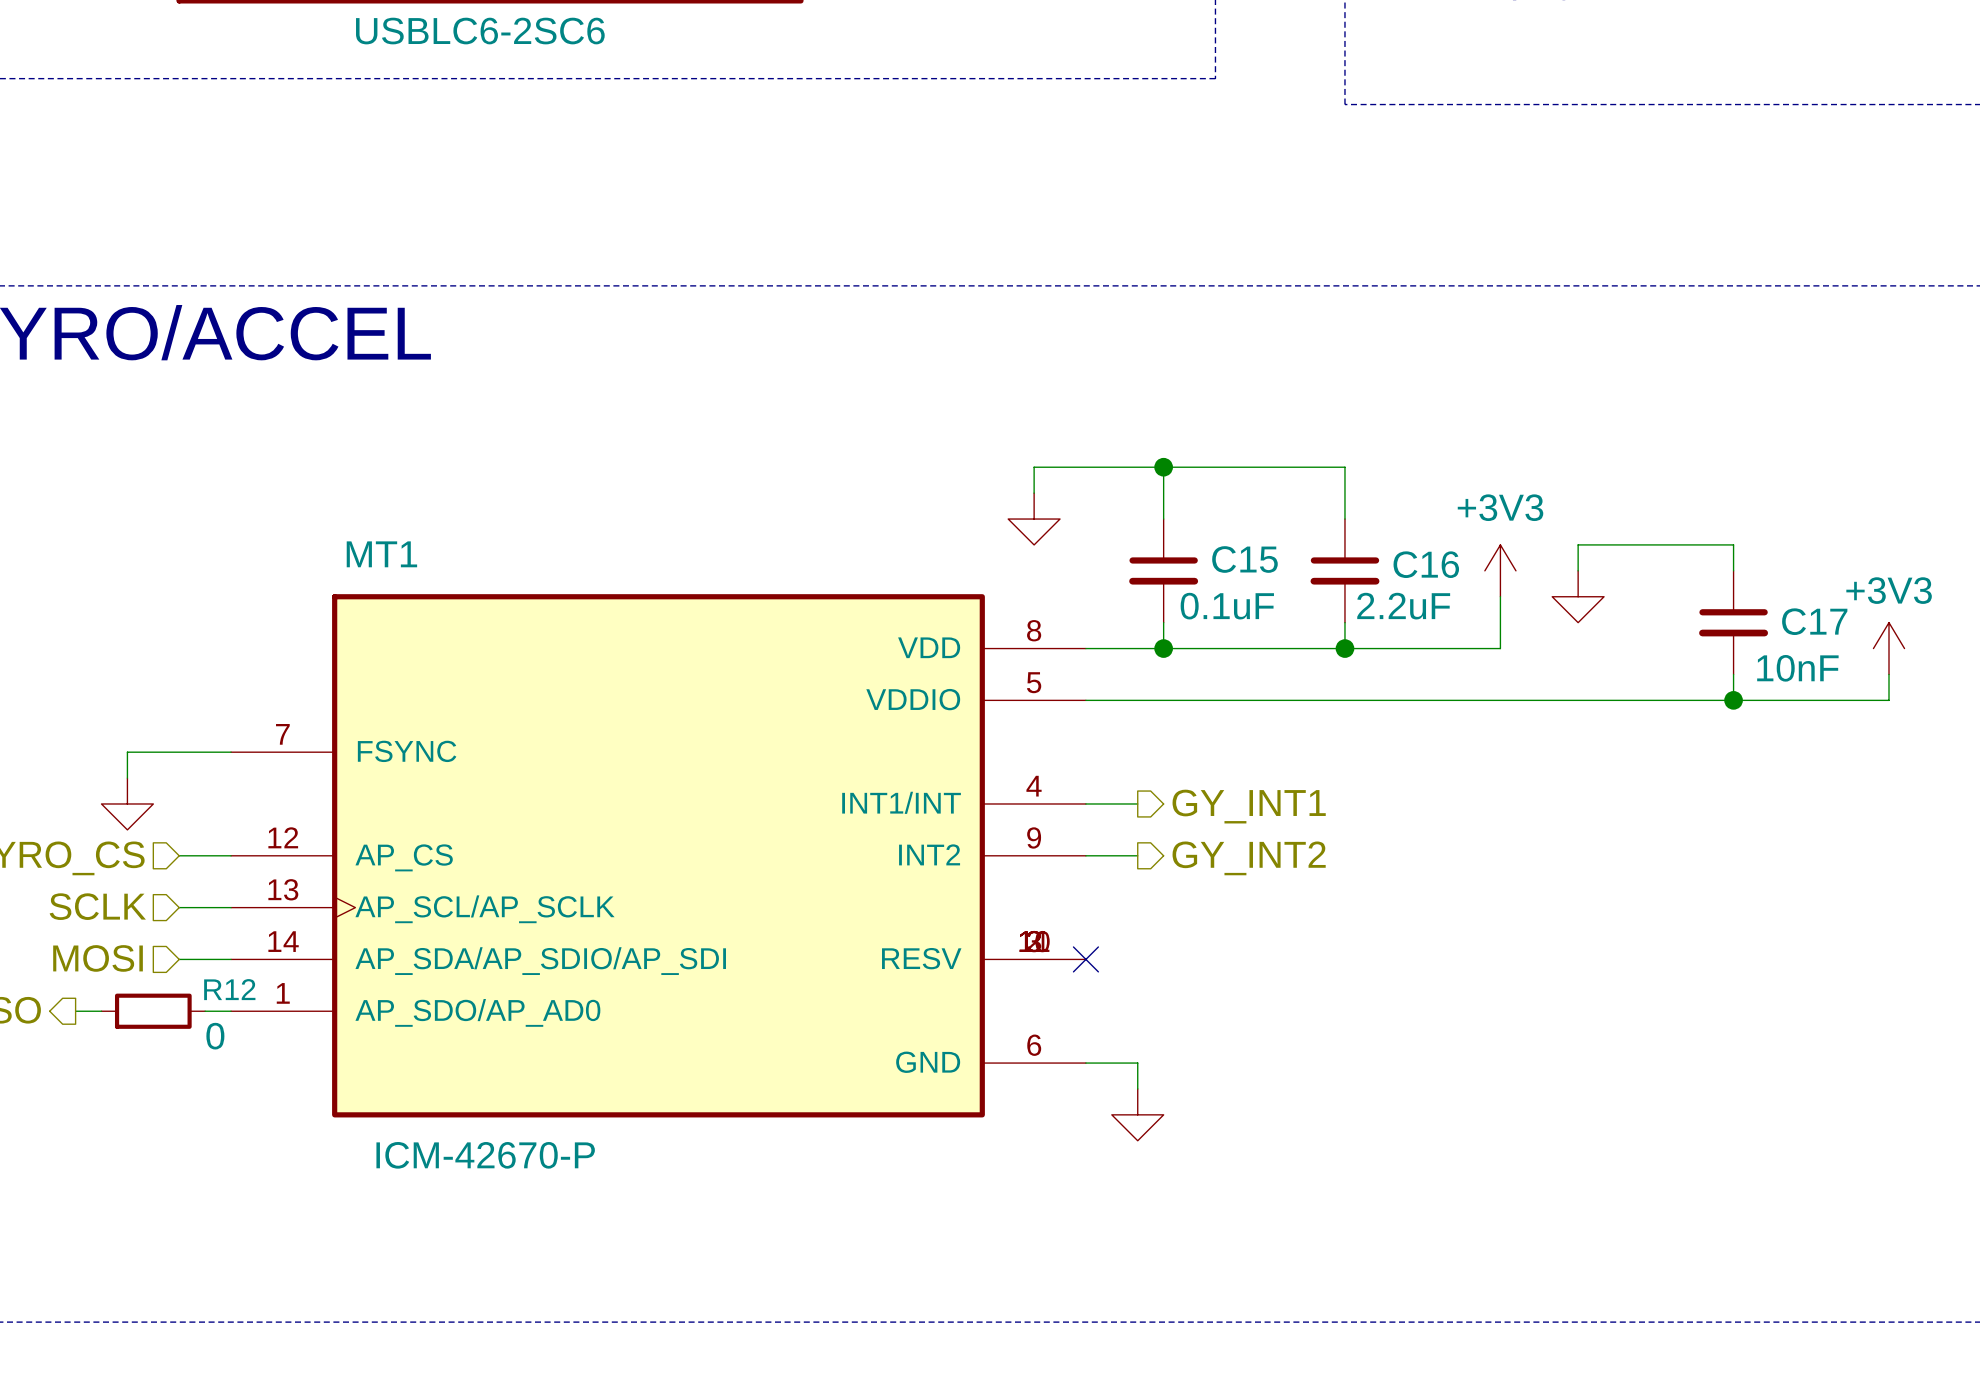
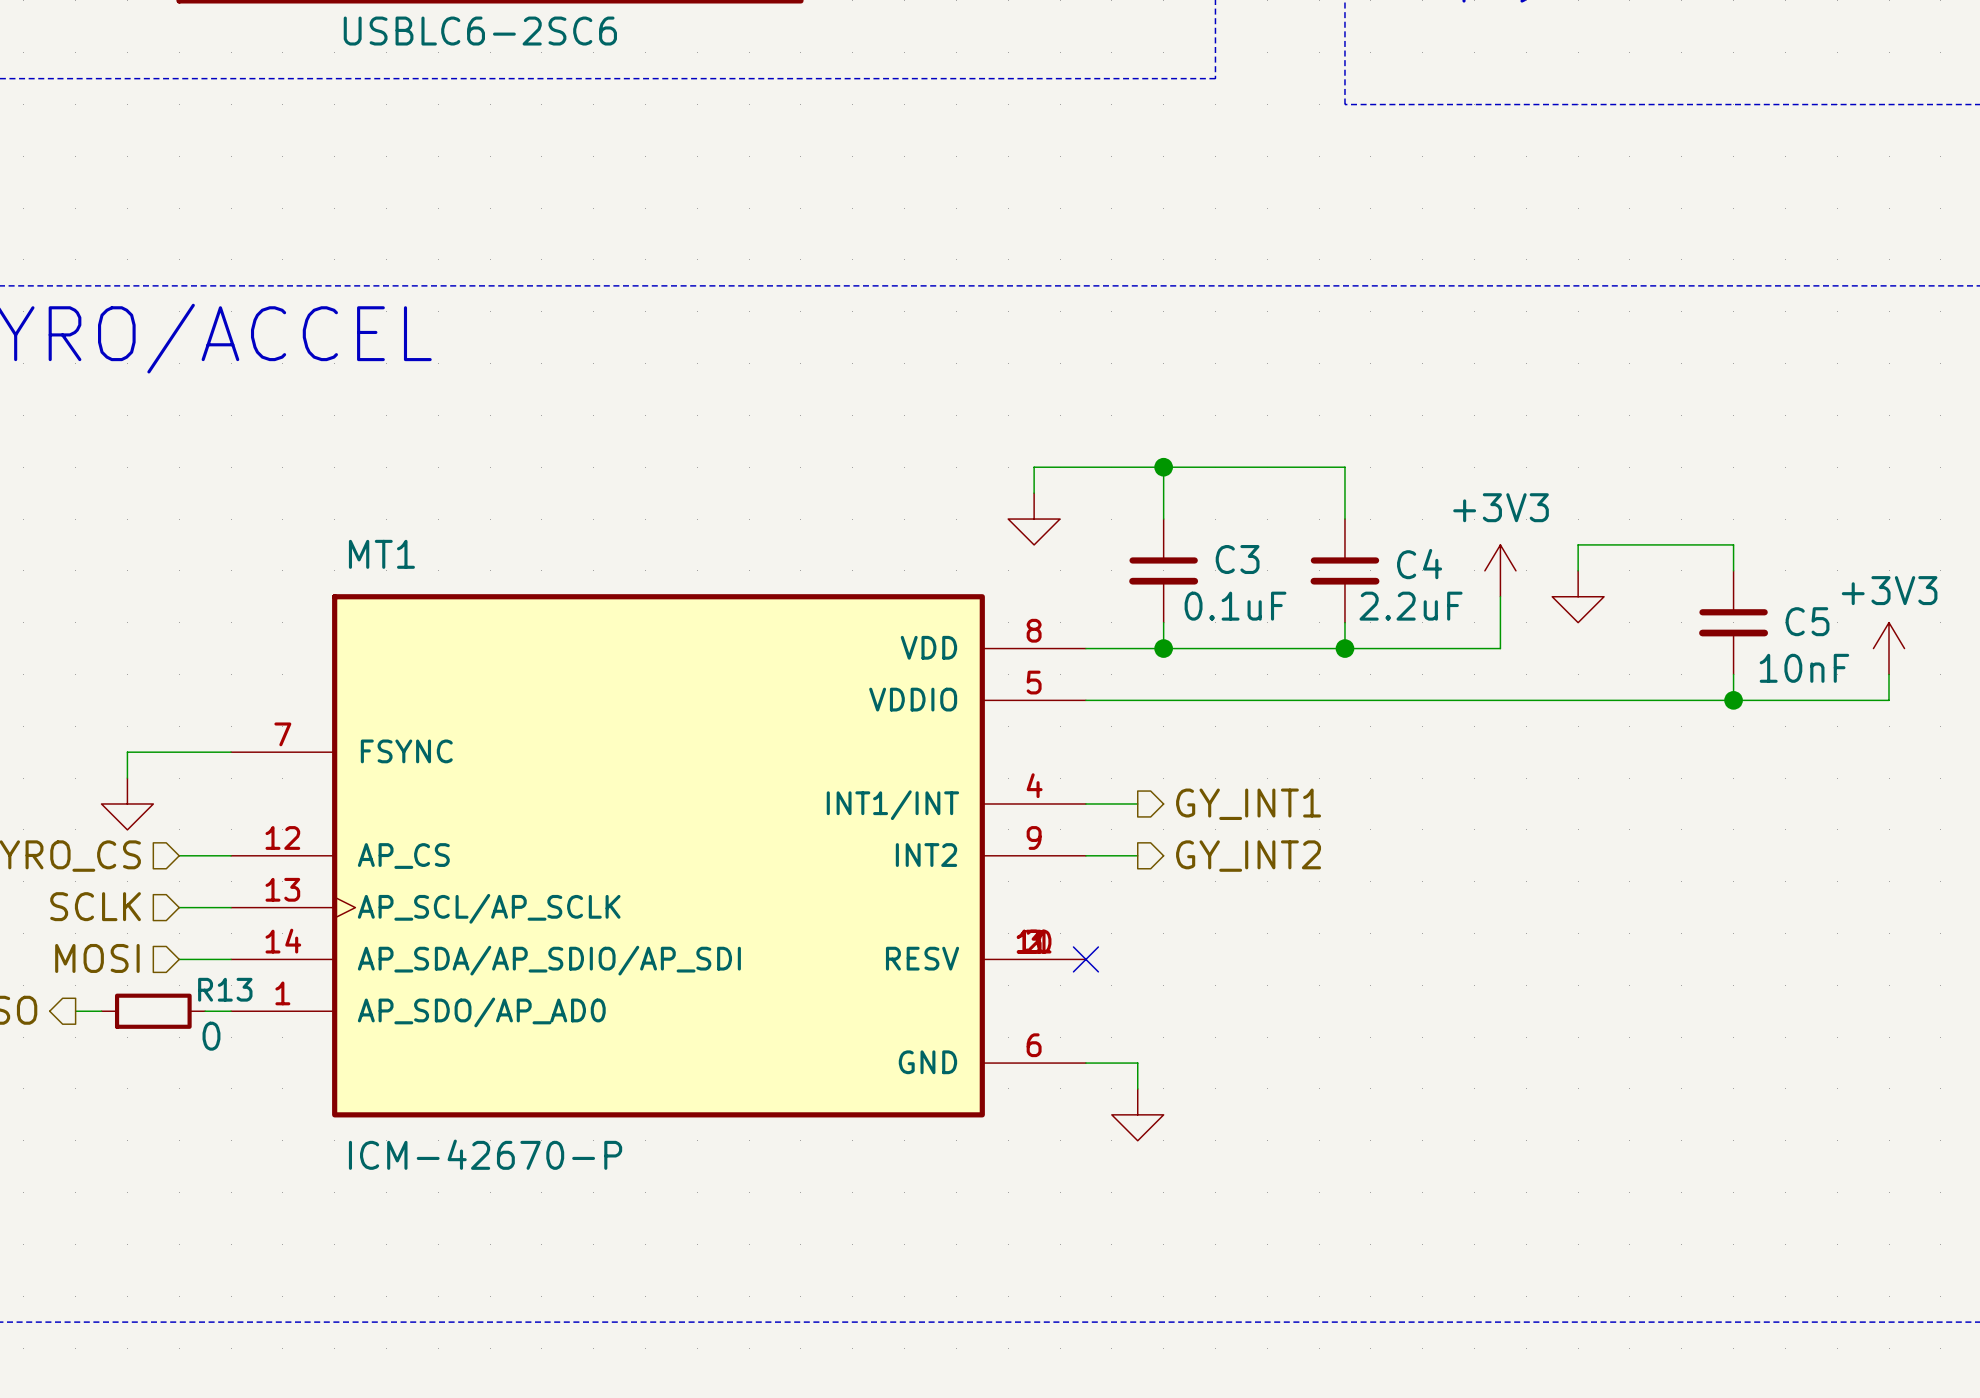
C15 name: C15 (1244, 559) -> C3 (1237, 559)
C16 name: C16 (1426, 564) -> C4 (1419, 564)
C17 name: C17 (1814, 621) -> C5 (1807, 621)
R12 name: R12 (229, 989) -> R13 (225, 989)

